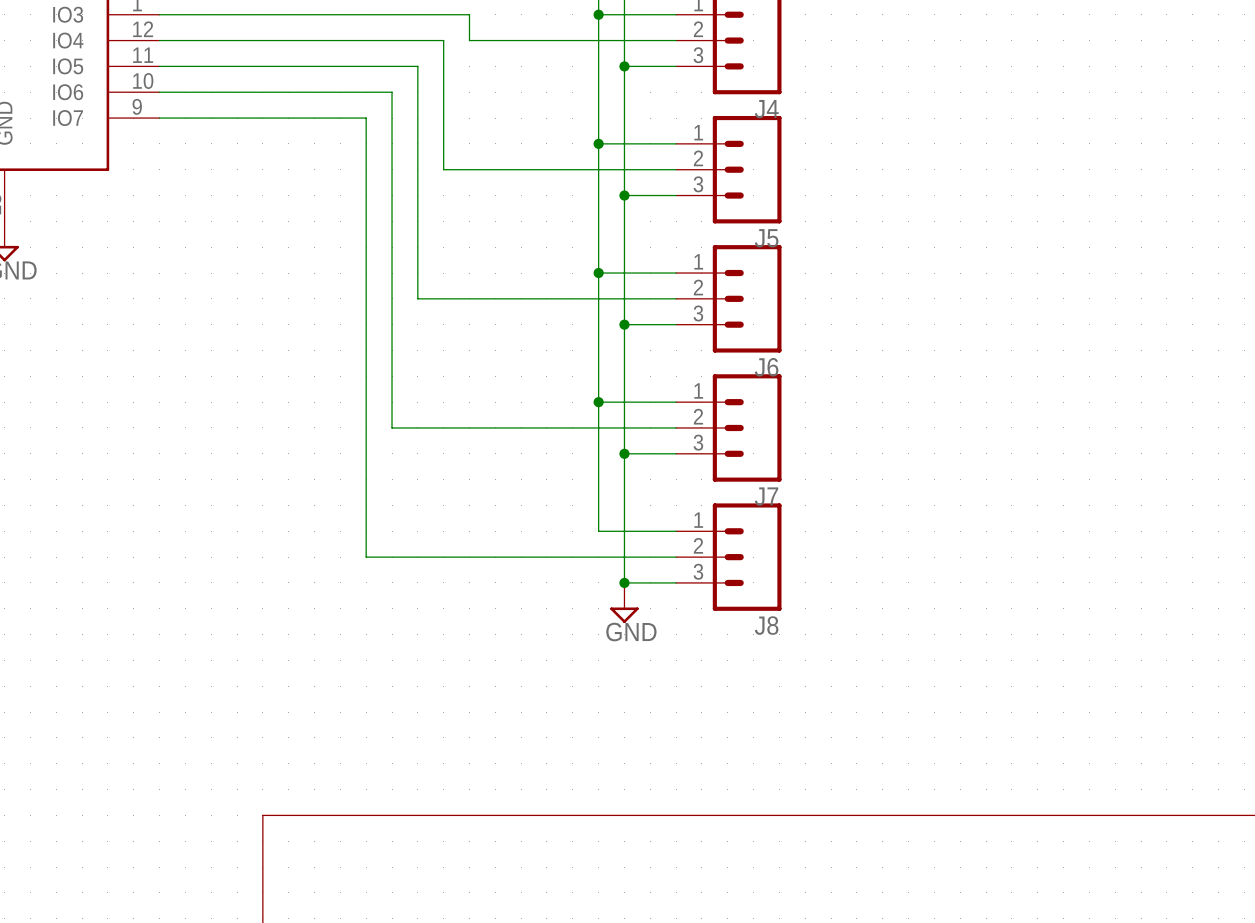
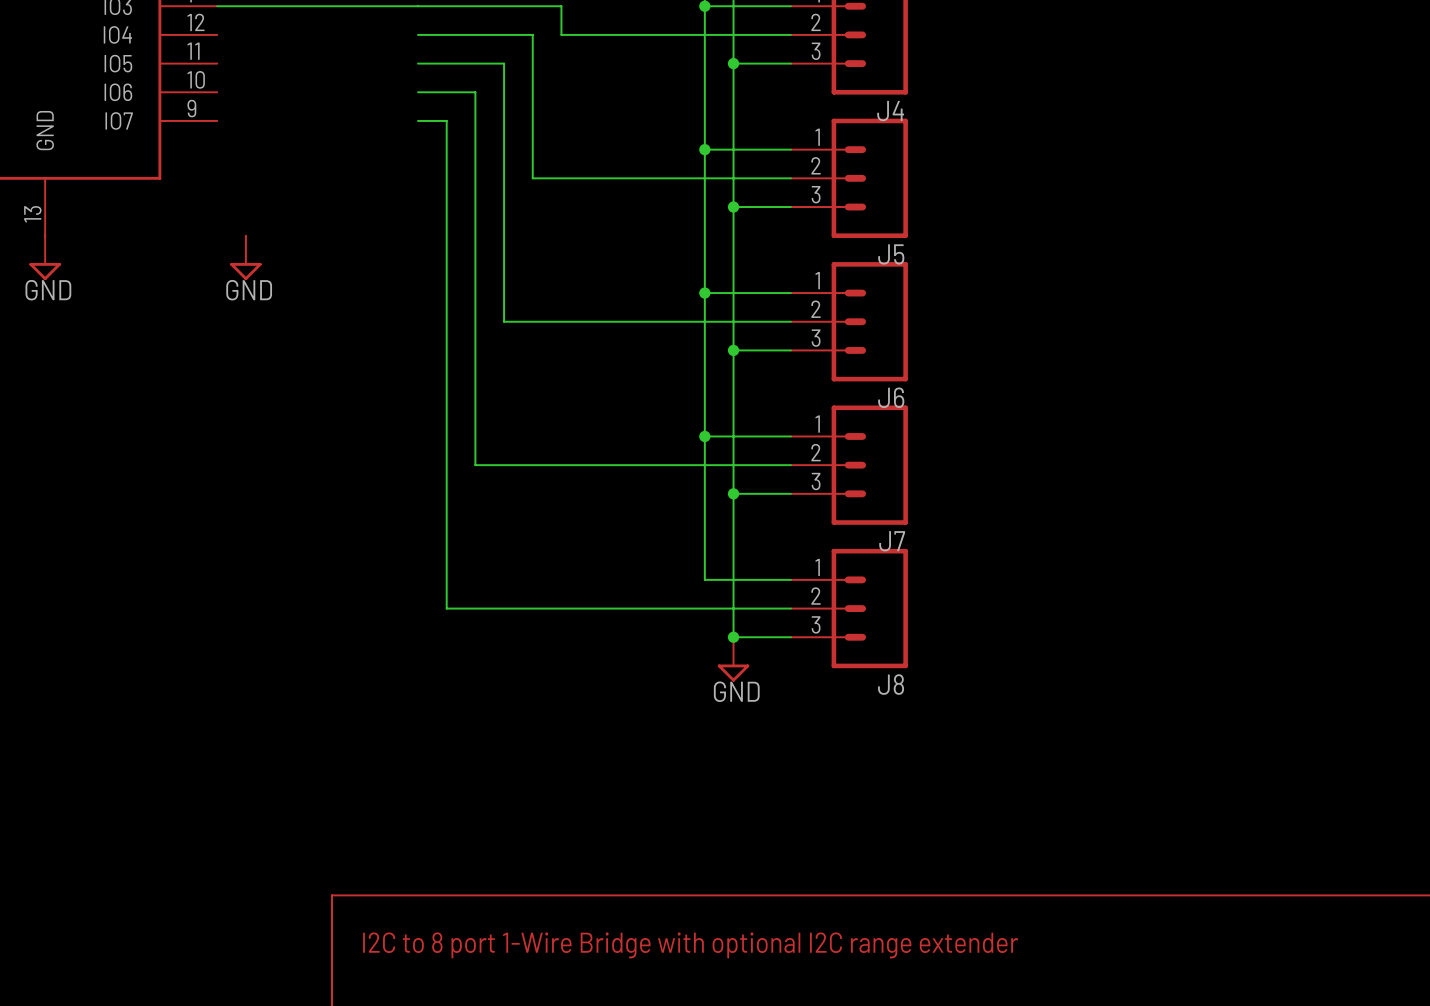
wire: (159, 40) (340, 40) -> none
wire: (159, 66) (340, 66) -> none
wire: (159, 92) (340, 92) -> none
wire: (159, 118) (340, 118) -> none
power symbol: none -> GND (245, 257)
text: none -> I2C to 8 port 1-Wire Bridge with optional I2C range extender (690, 945)

